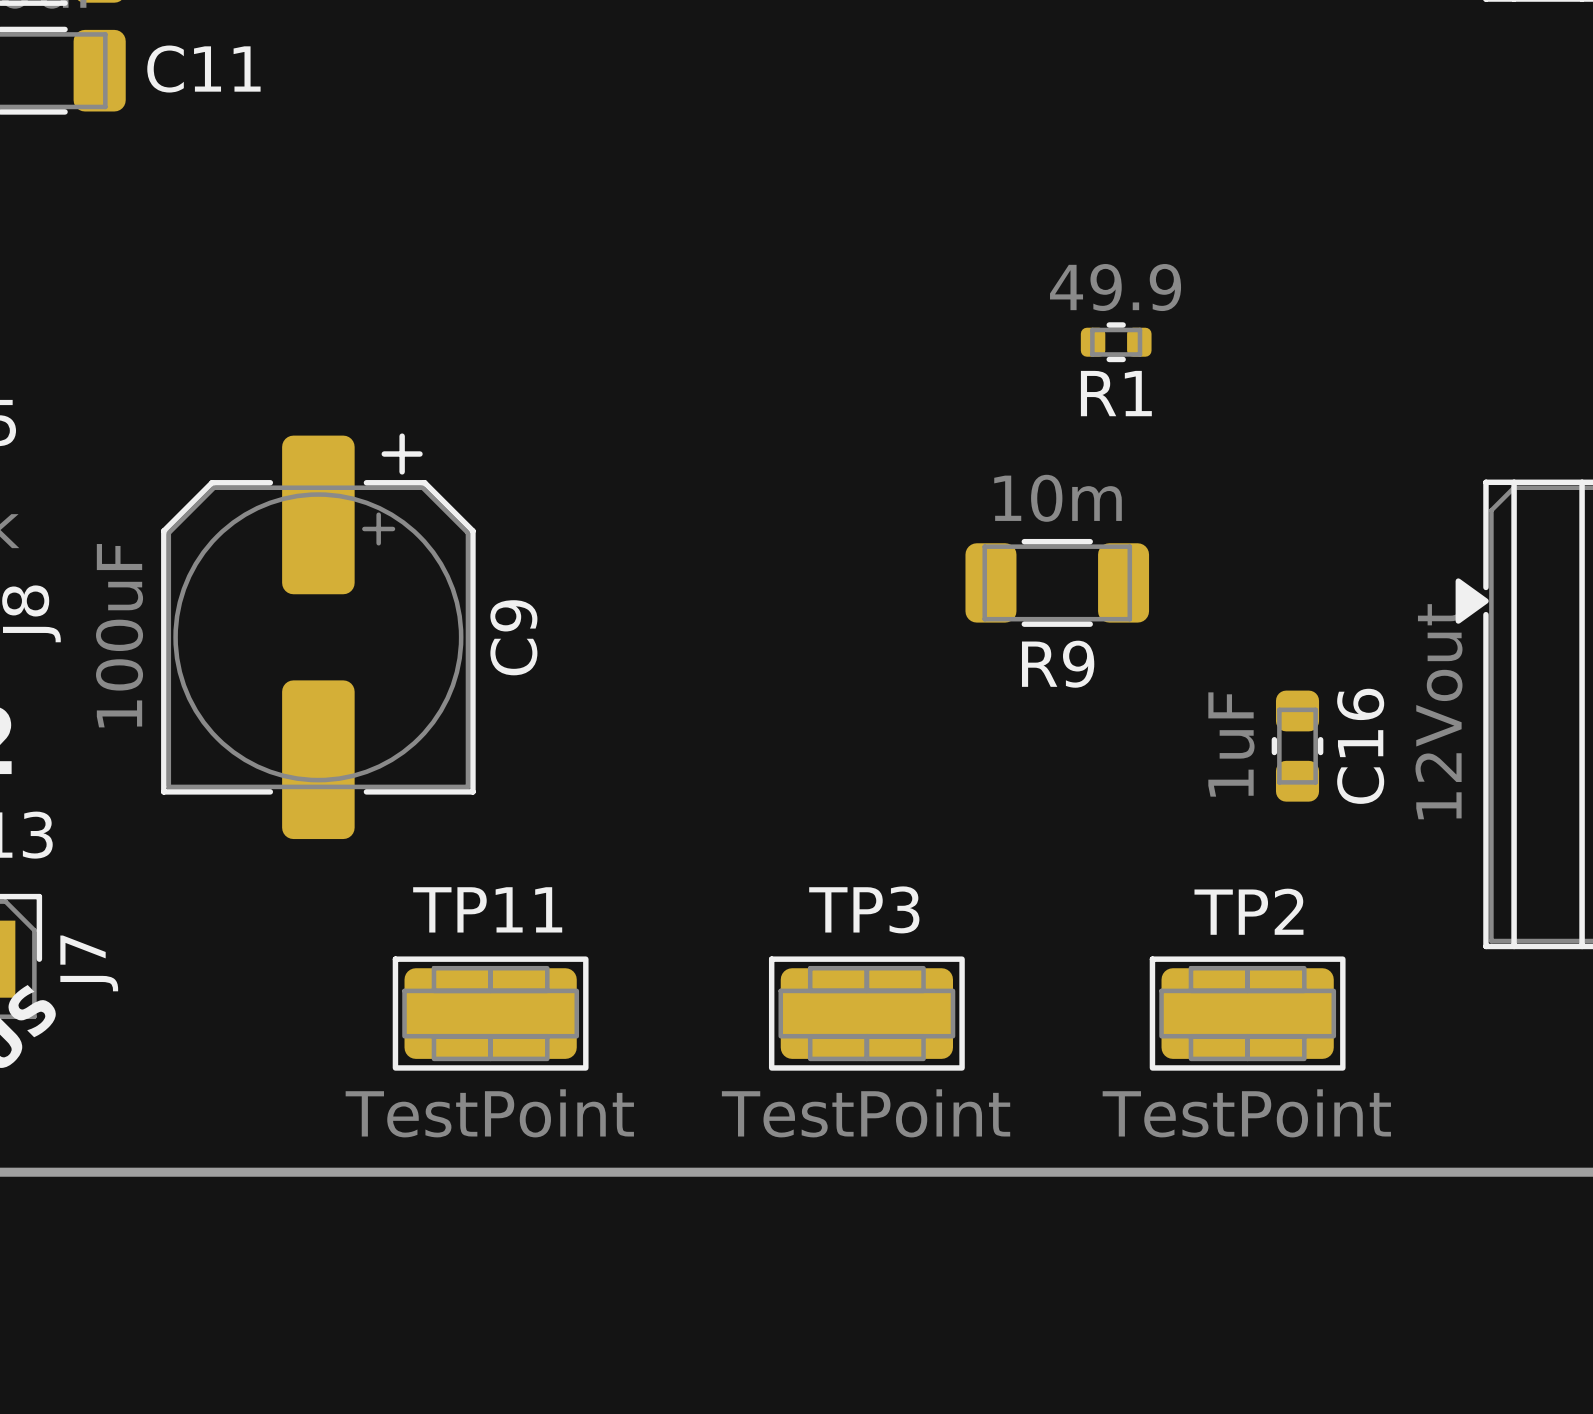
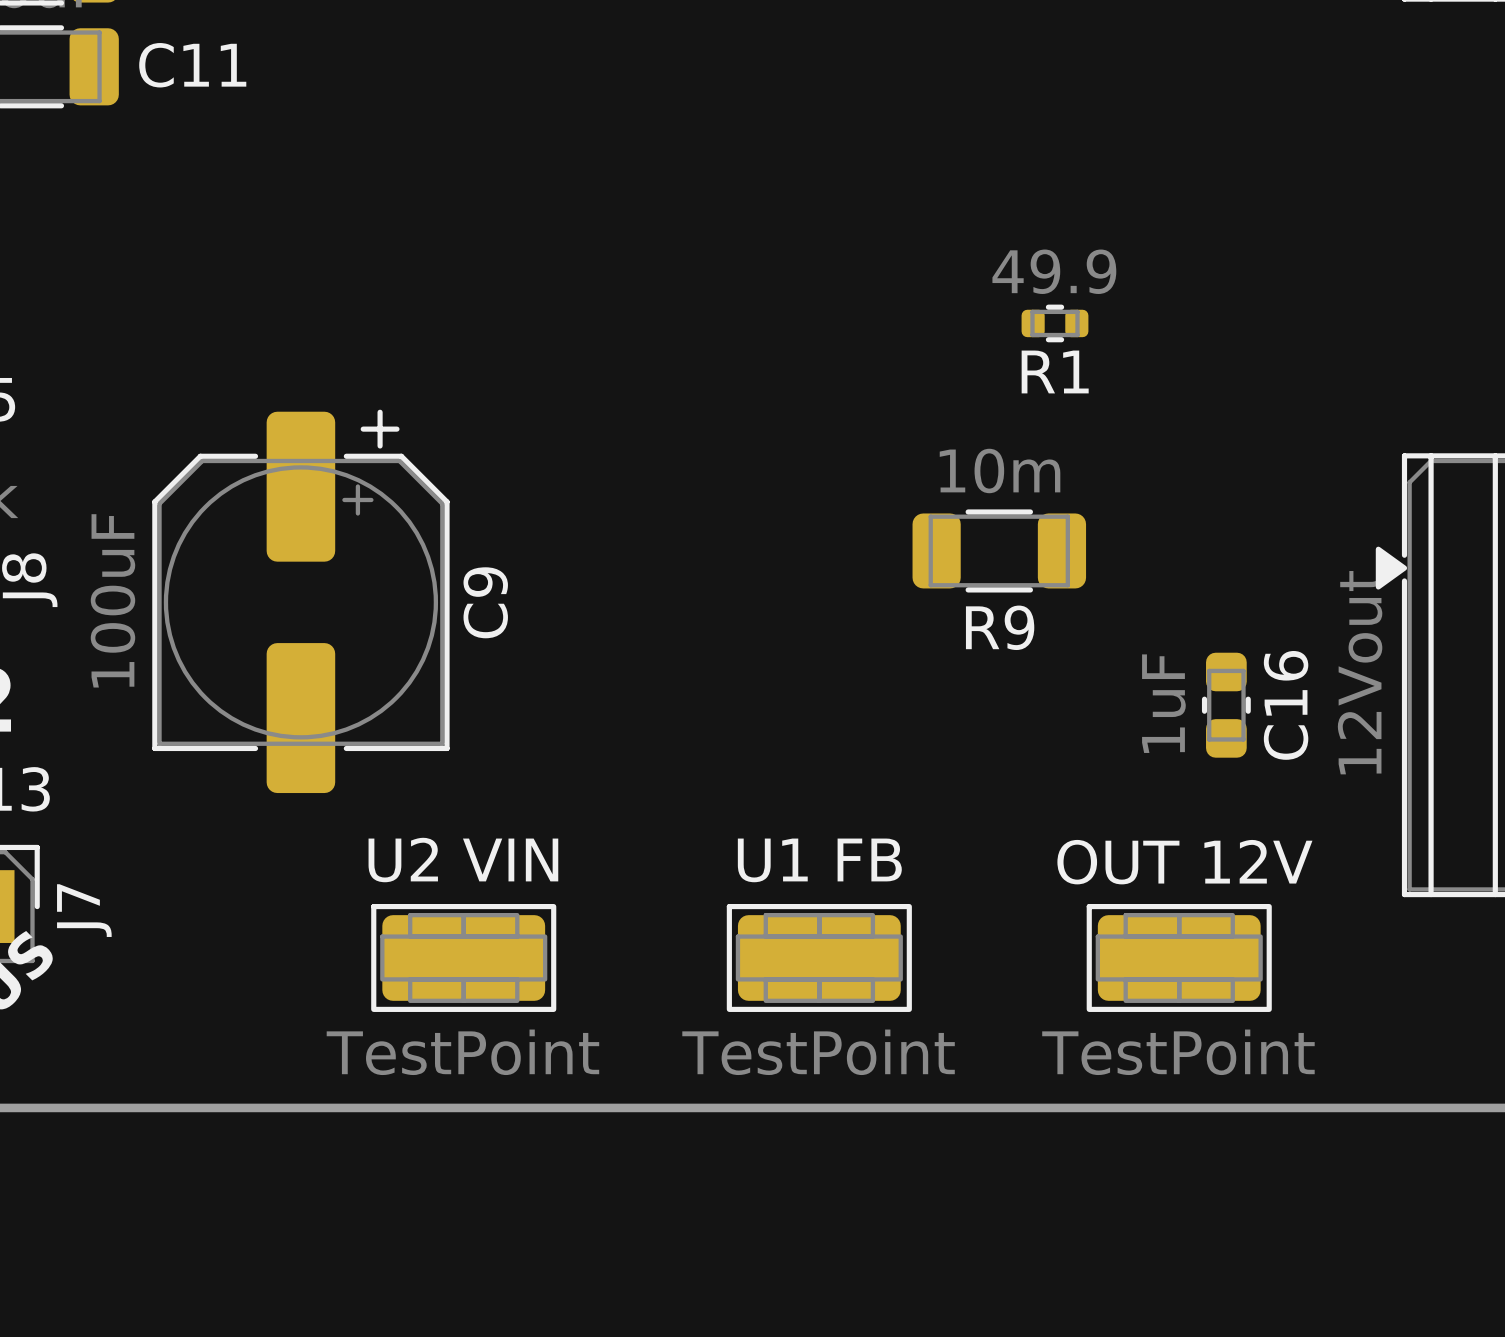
TP11 name: TP11 (487, 909) -> U2 VIN (463, 860)
TP3 name: TP3 (864, 909) -> U1 FB (819, 860)
TP2 name: TP2 (1248, 911) -> OUT 12V (1184, 862)

